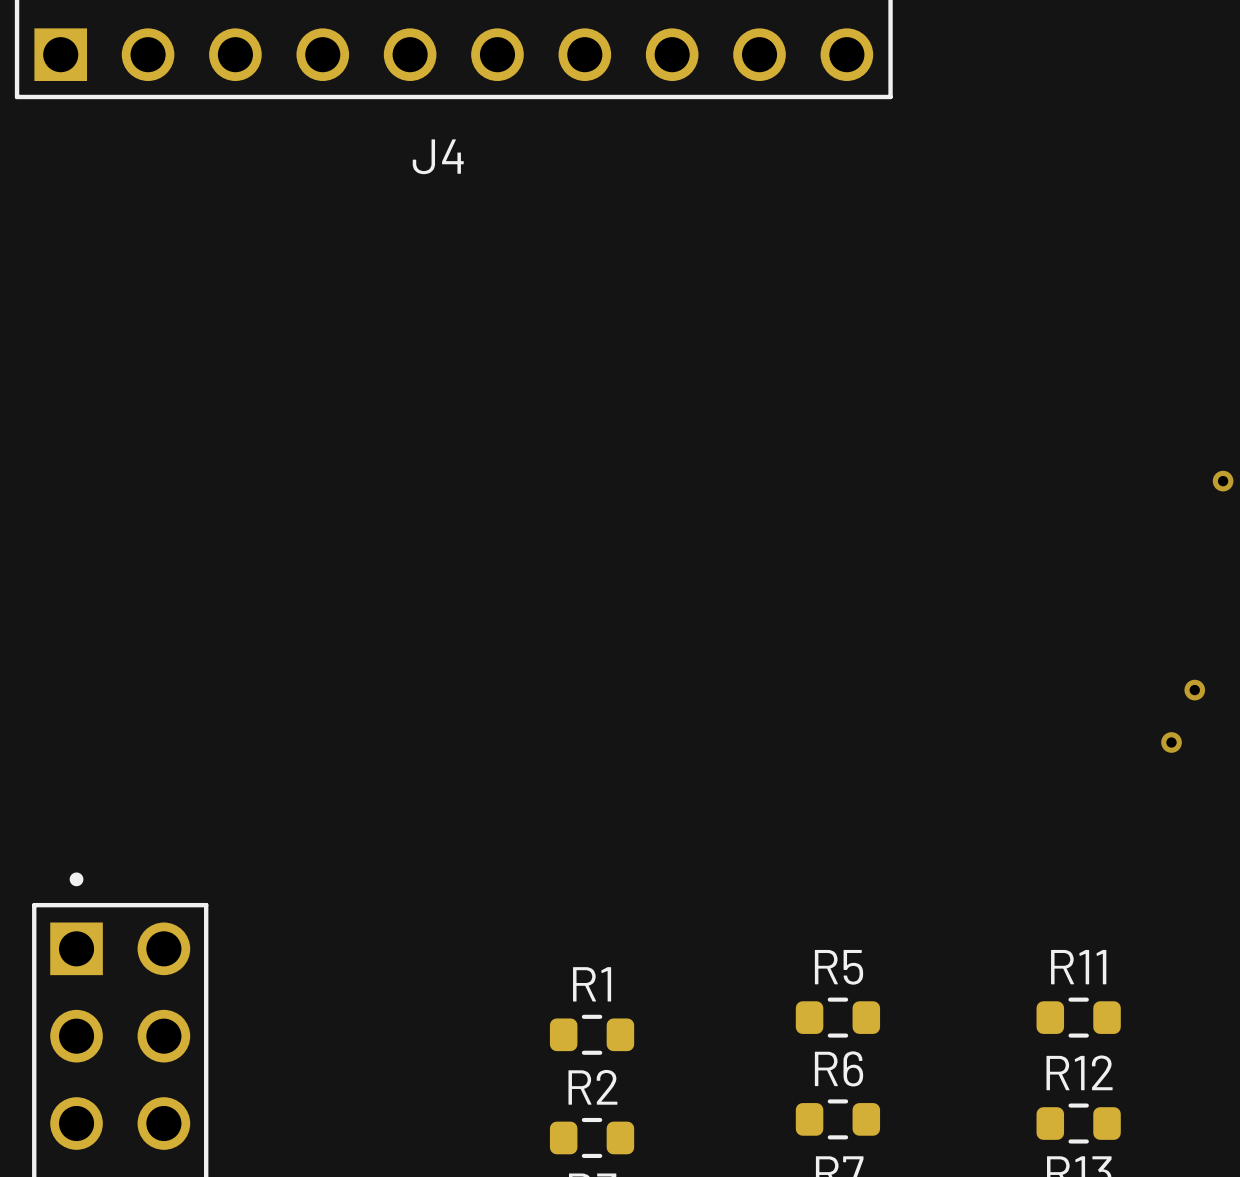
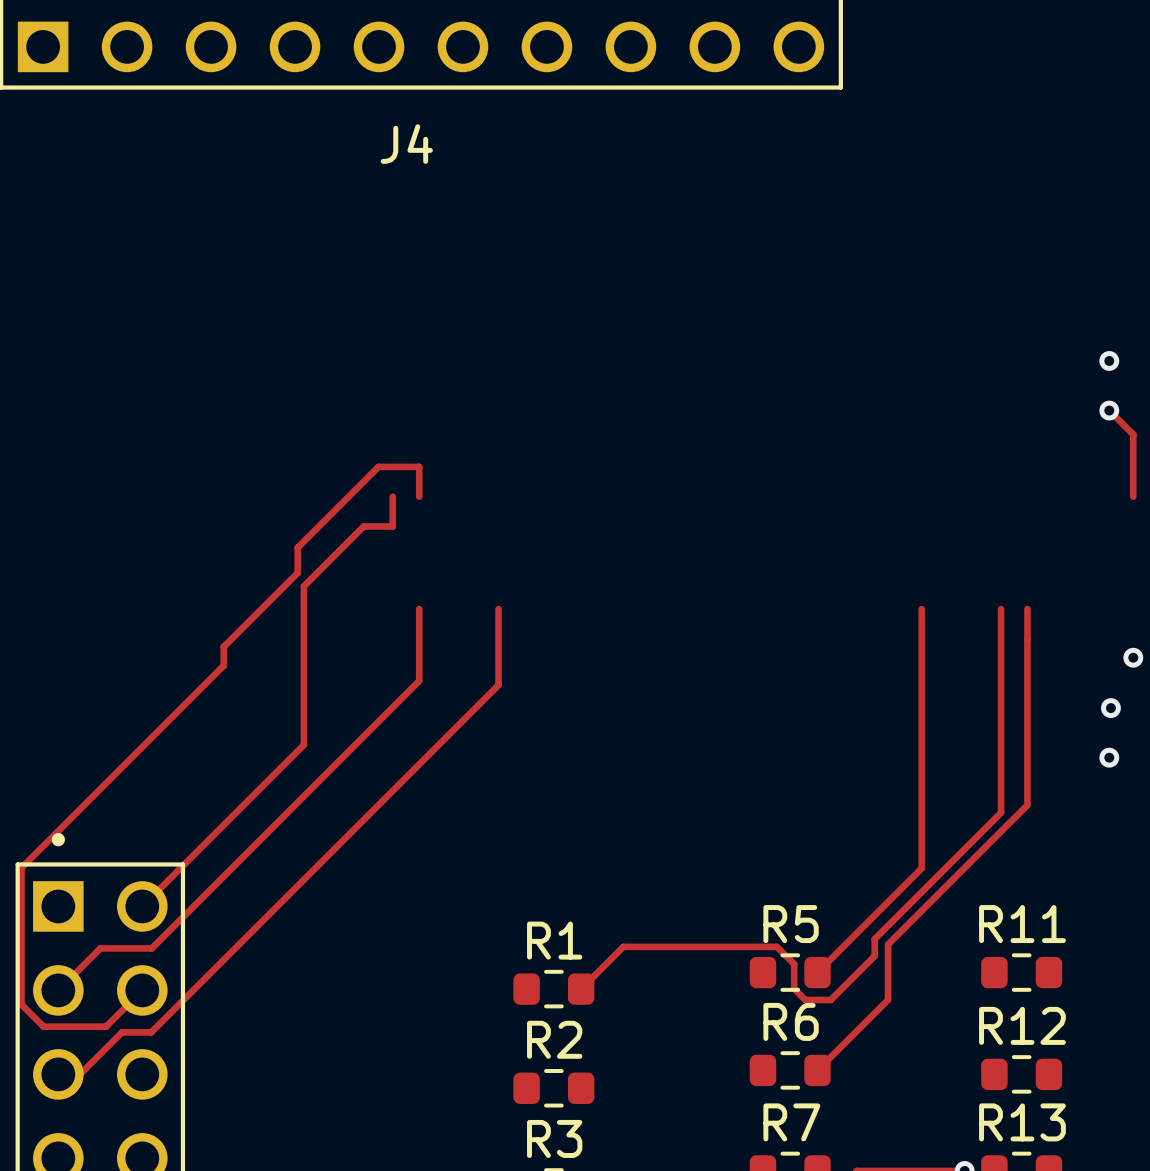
via: none -> (1109, 360)
track: none -> (1109, 410) (1133, 434) (1133, 496)
via: none -> (1109, 410)
track: none -> (392, 496) (392, 526) (363, 526) (303, 586) (303, 744) (142, 906)
track: none -> (419, 496) (419, 466) (378, 466) (297, 547) (297, 572) (223, 646) (223, 665) (21, 867) (21, 1004) (43, 1026) (106, 1026) (142, 990)
track: none -> (419, 609) (419, 680) (151, 948) (100, 948) (58, 990)
track: none -> (498, 609) (498, 685) (151, 1032) (121, 1032) (80, 1074) (58, 1074)
track: none -> (921, 609) (921, 868) (817, 972)
track: none -> (1001, 609) (1001, 812) (874, 939) (874, 956) (830, 999) (805, 999) (794, 988) (794, 964) (776, 946) (623, 946) (581, 989)
track: none -> (1027, 609) (1027, 638)
track: none -> (1027, 639) (1027, 805) (888, 944) (888, 999) (817, 1070)
via: none -> (1109, 757)

